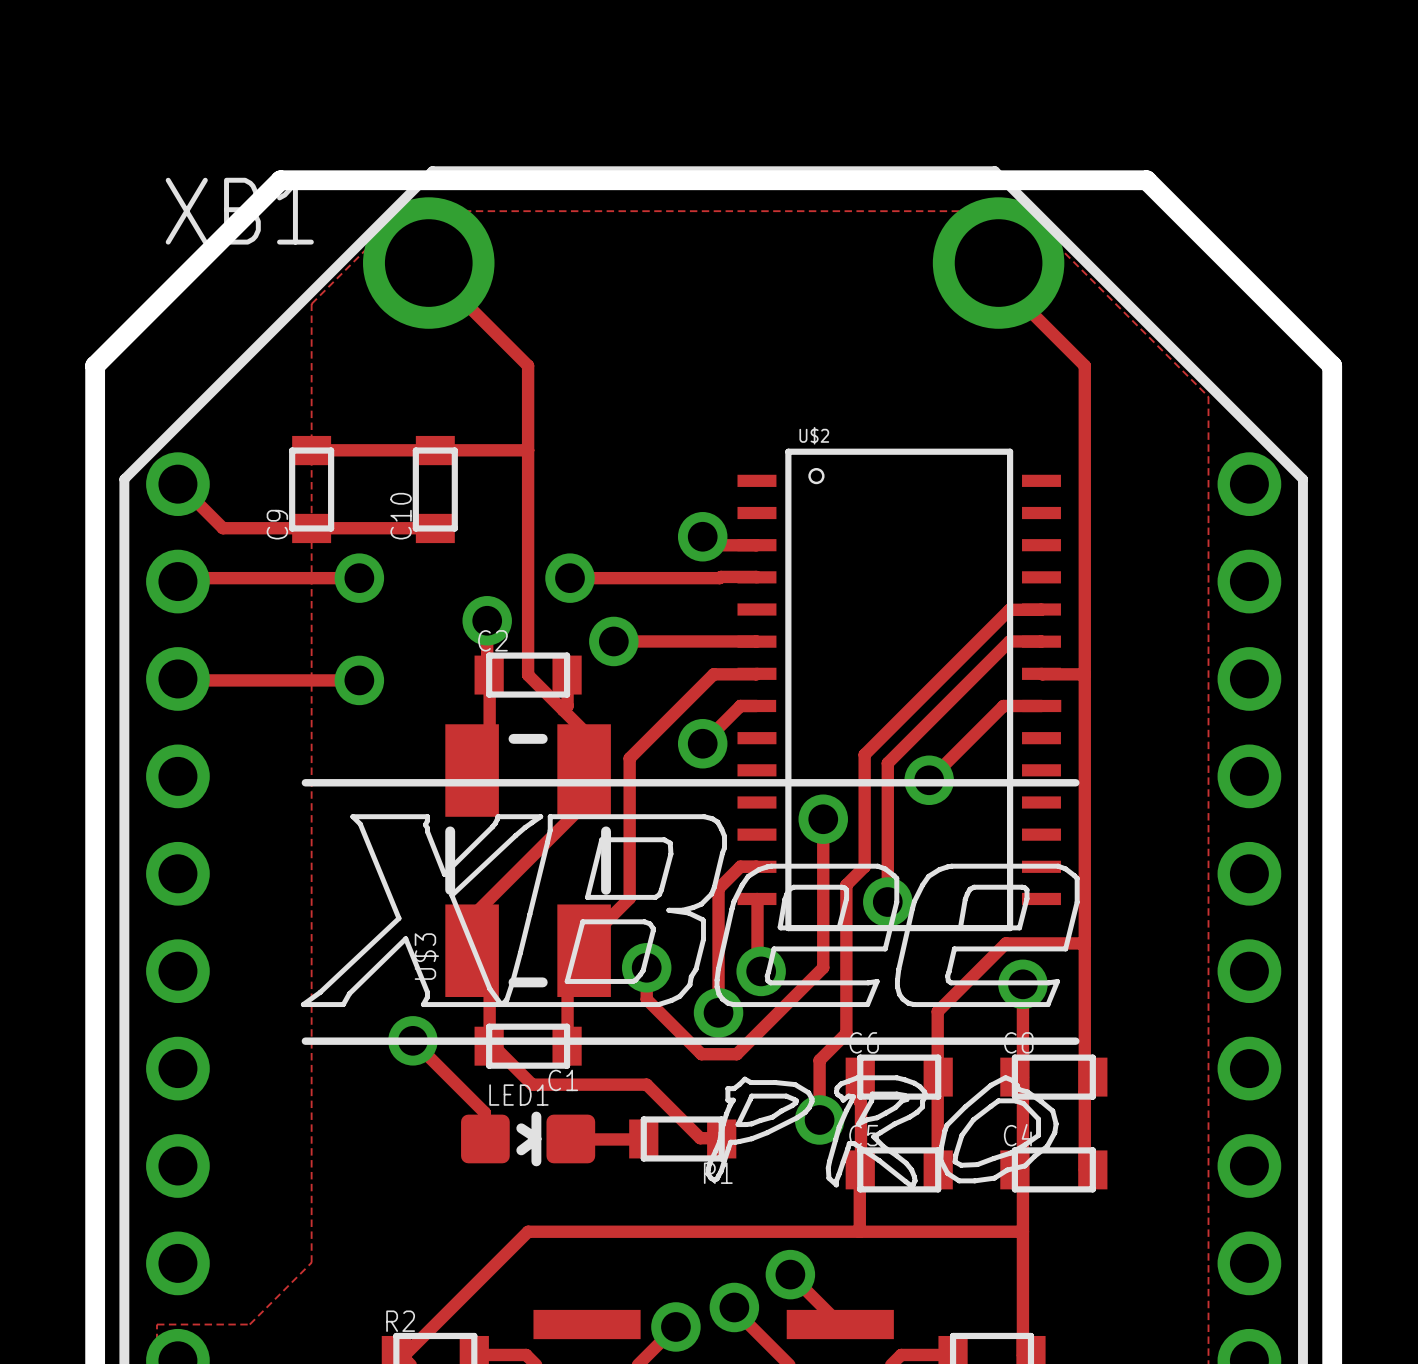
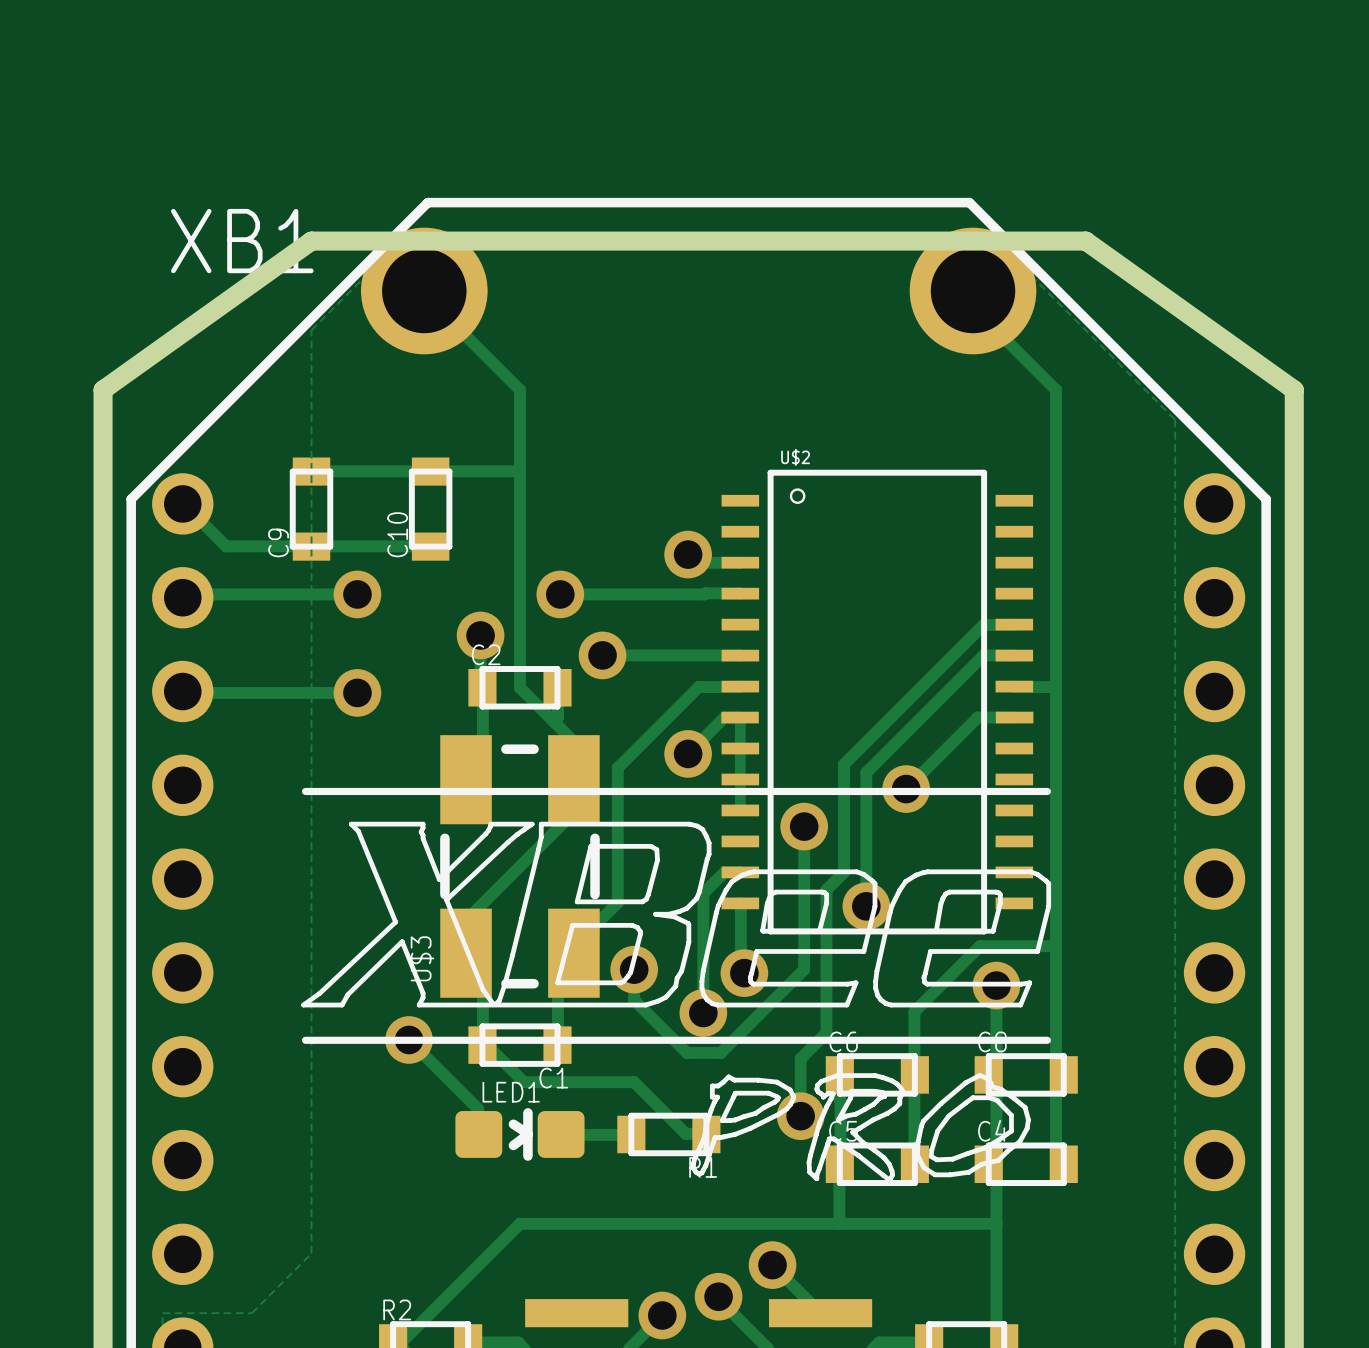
board edge: (95, 365) (280, 180) (1146, 180) (1332, 365) -> (103, 389) (311, 241) (1085, 241) (1294, 389)
track: none -> (740, 717) (740, 810)

